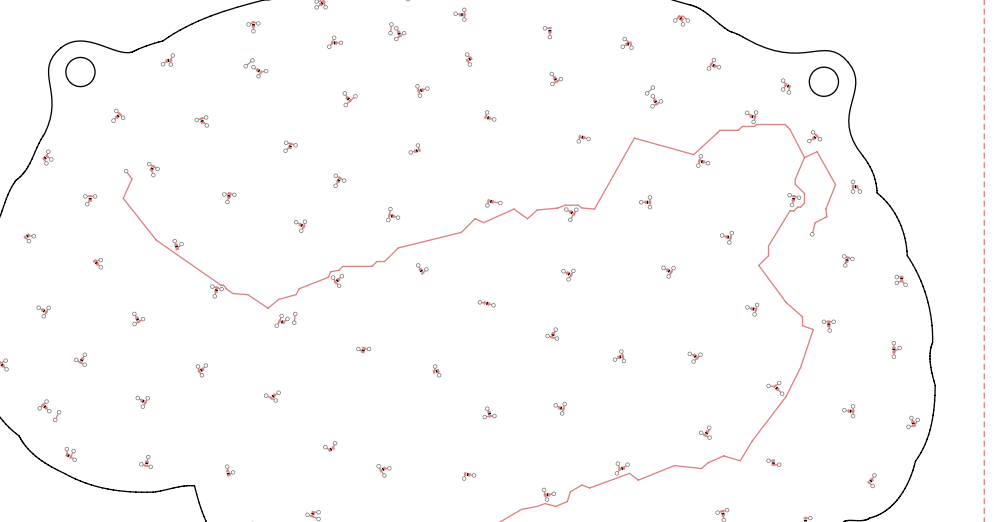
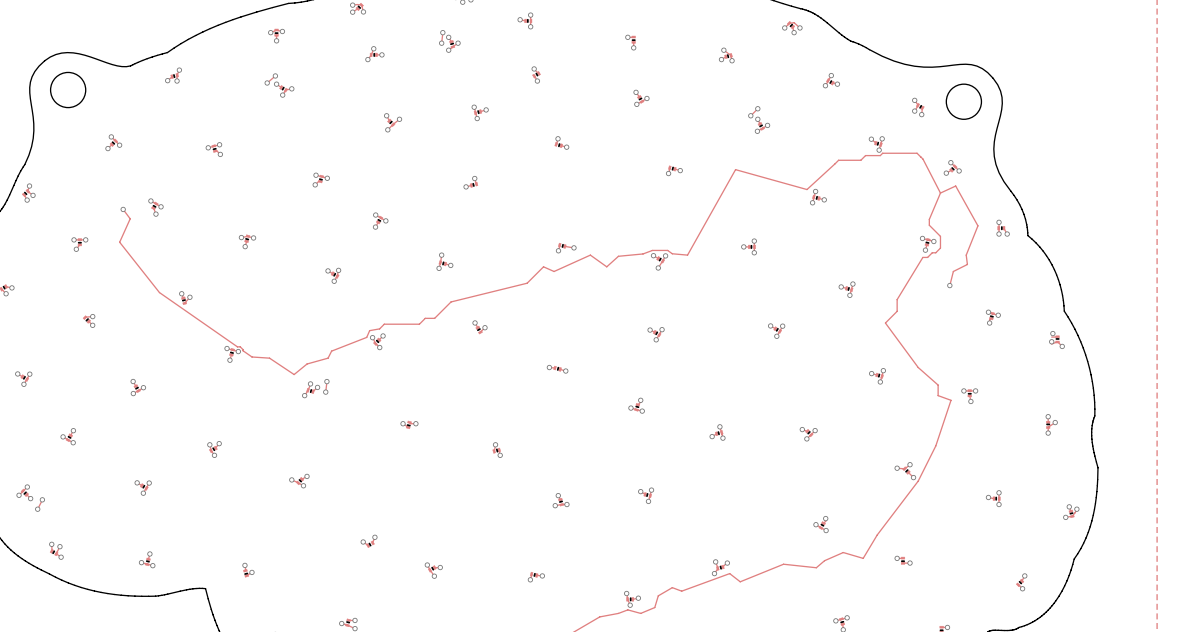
via: none -> (1052, 333)
via: (896, 277) -> none
via: none -> (1051, 341)
via: (896, 282) -> none

